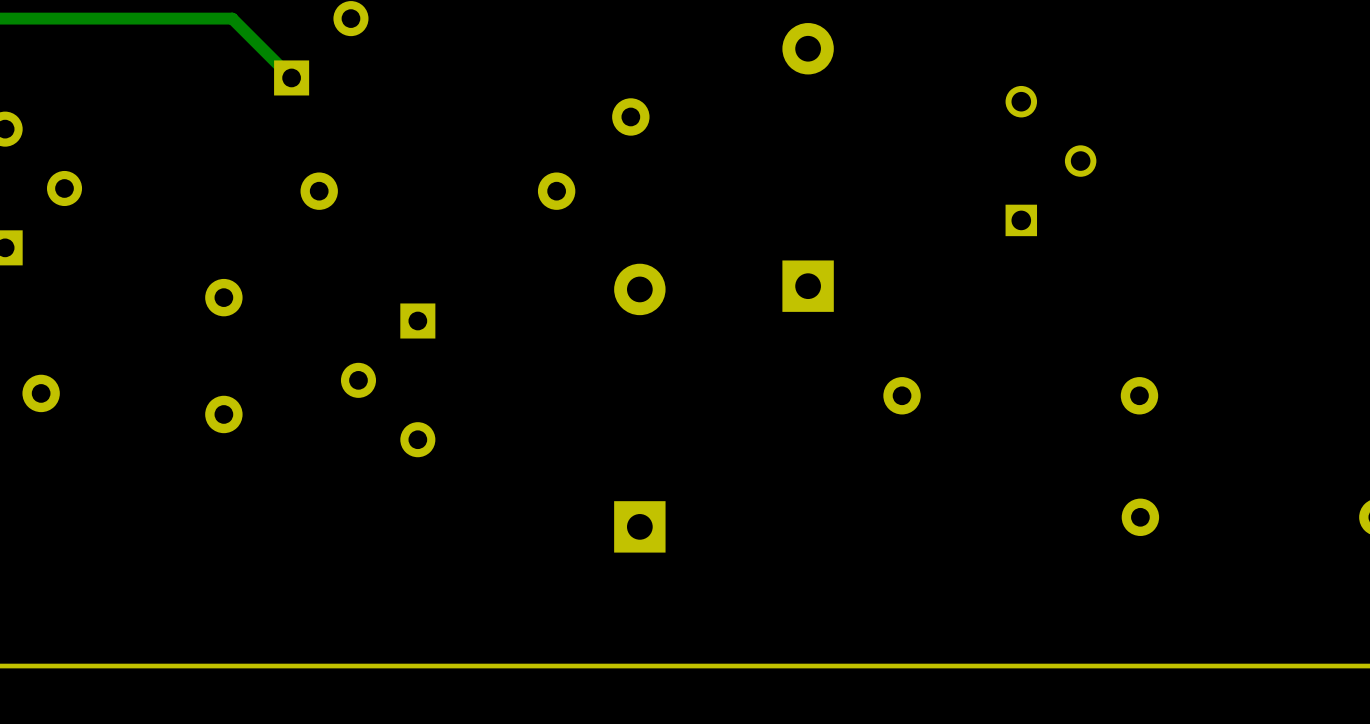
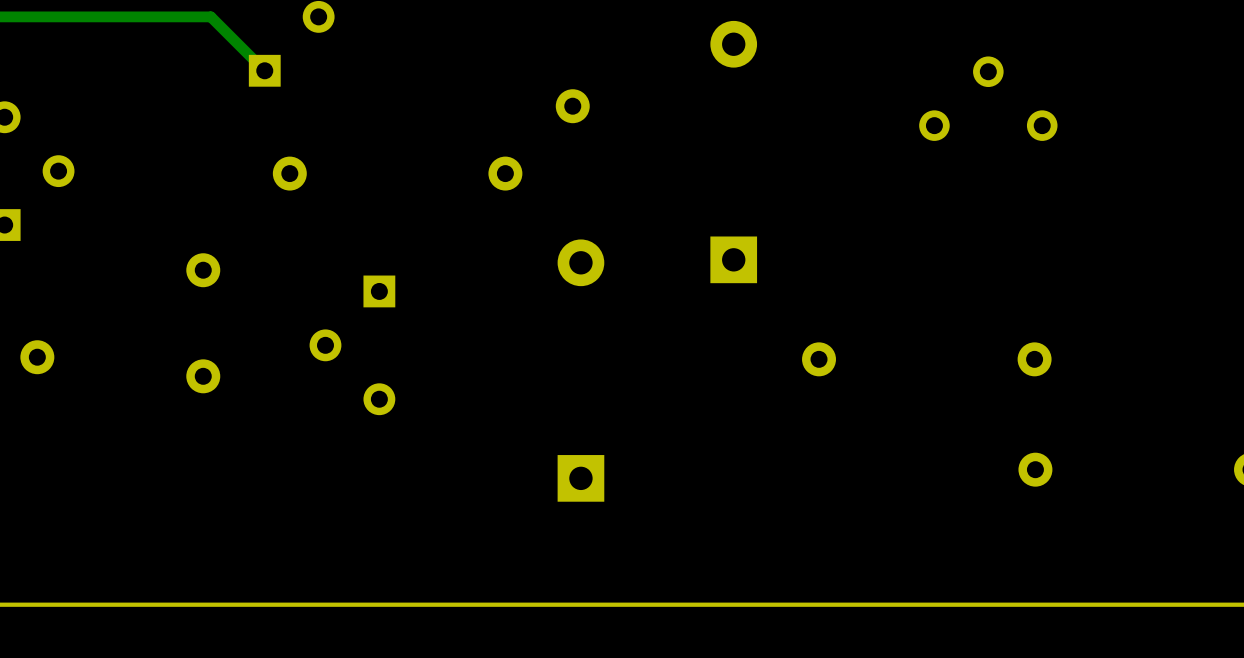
part: none -> (988, 98)
part: (1050, 161) -> none

